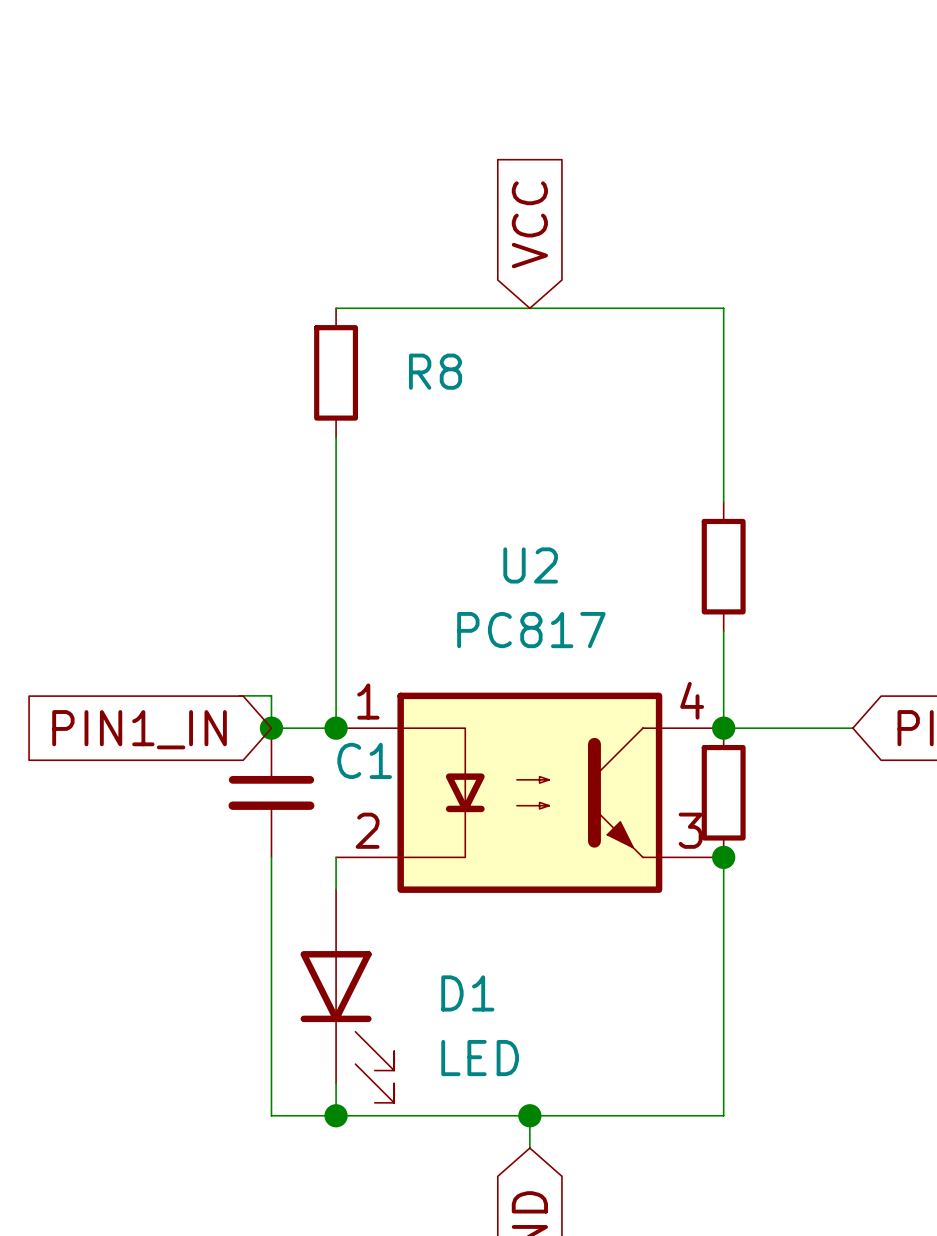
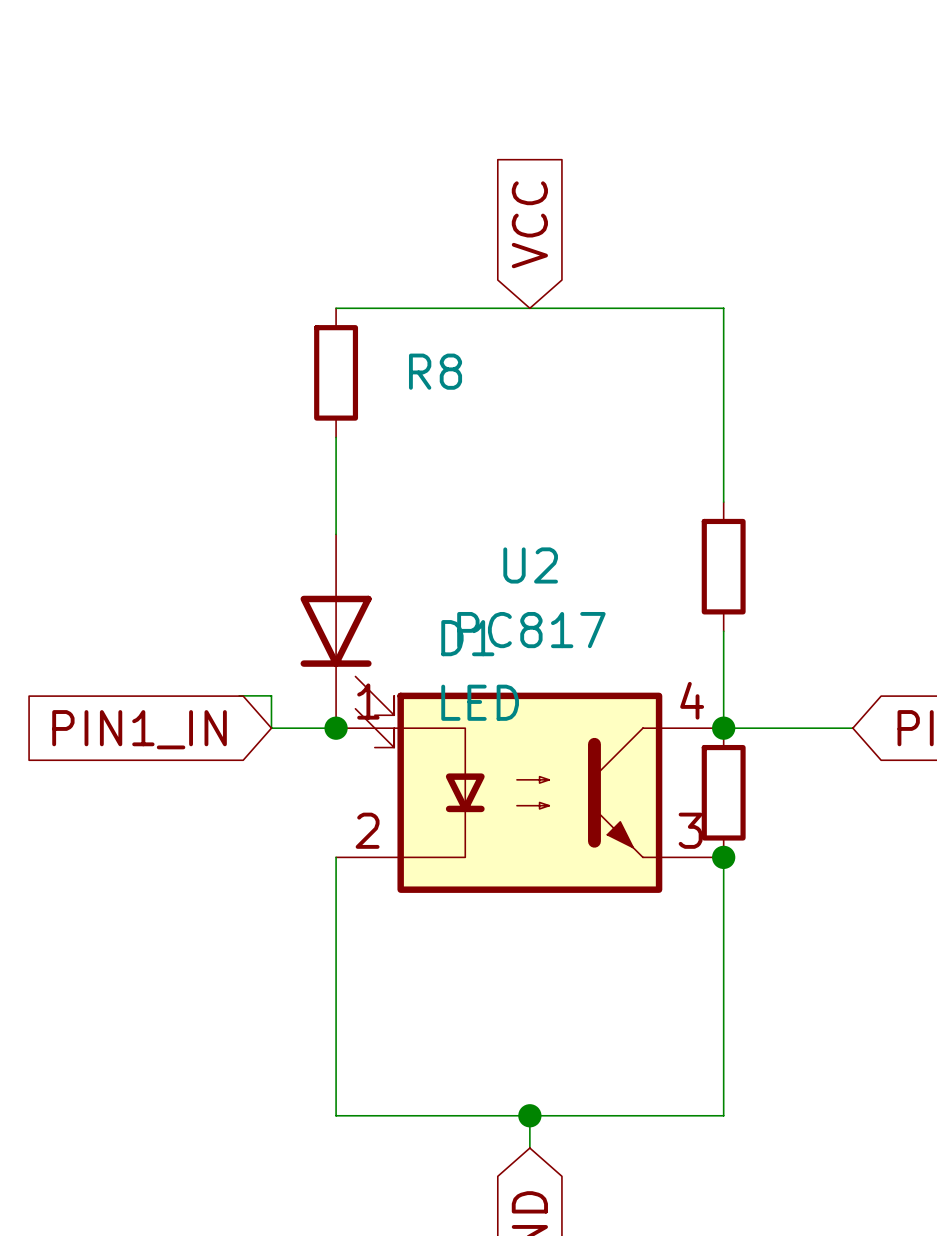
junction: (271, 728) -> none
C1: (271, 792) -> none
wire: (271, 857) (271, 1115) (336, 1115) -> none
D1 position: (347, 996) -> (347, 640)
junction: (336, 1115) -> none

